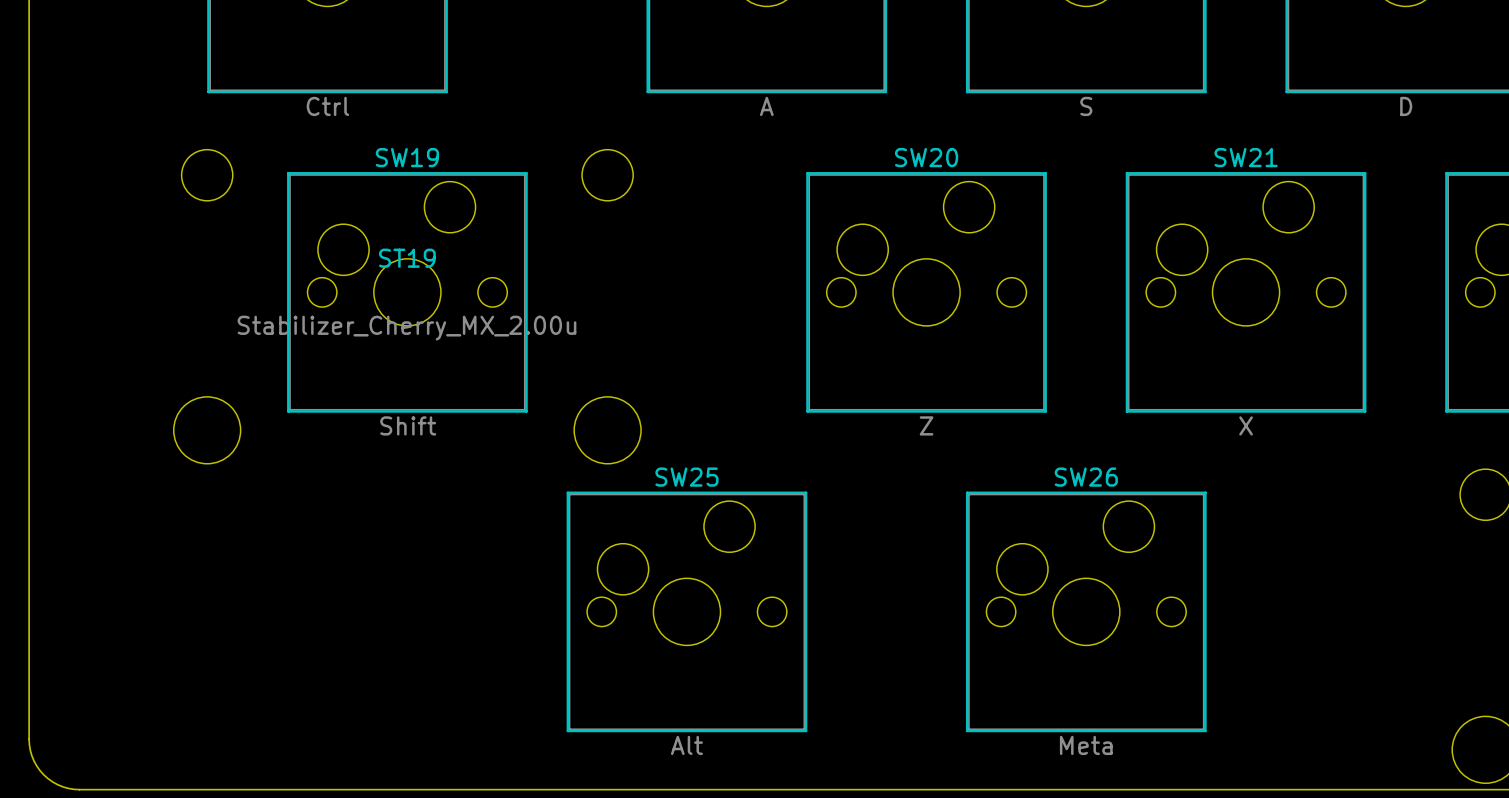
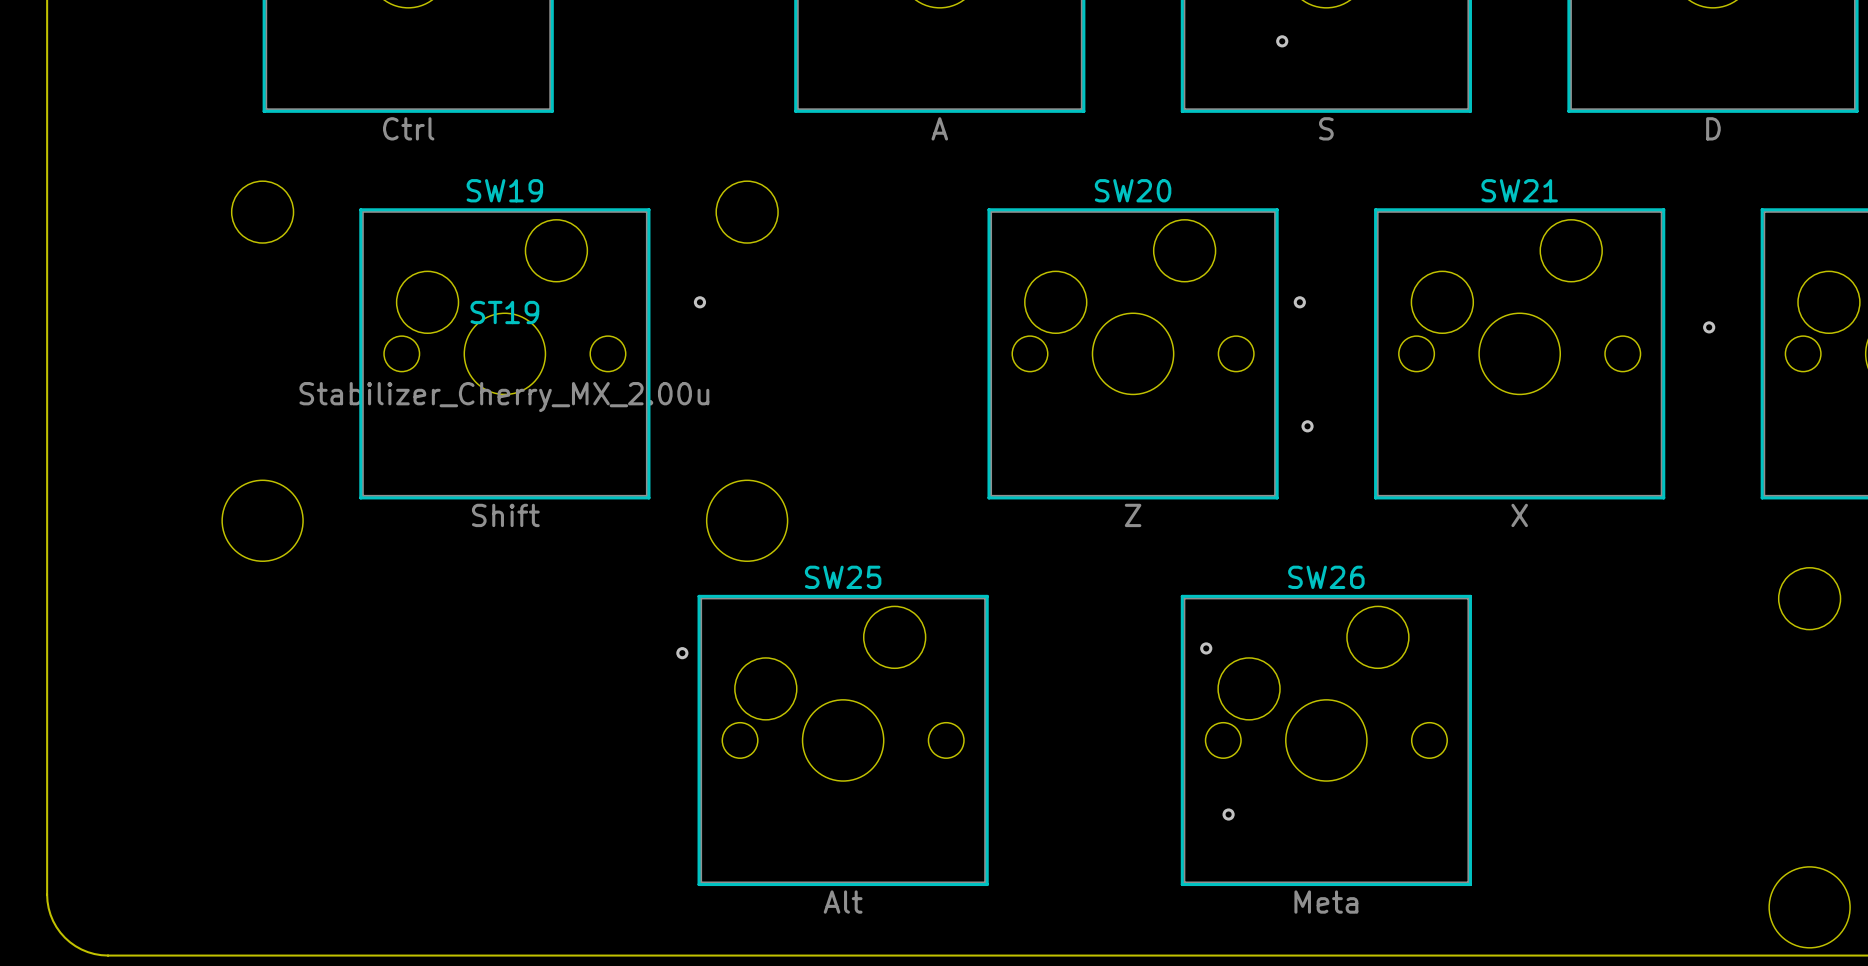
via: none -> (1282, 41)
via: none -> (699, 302)
via: none -> (1299, 302)
via: none -> (1709, 327)
via: none -> (1307, 426)
via: none -> (1206, 648)
via: none -> (682, 653)
via: none -> (1228, 814)

